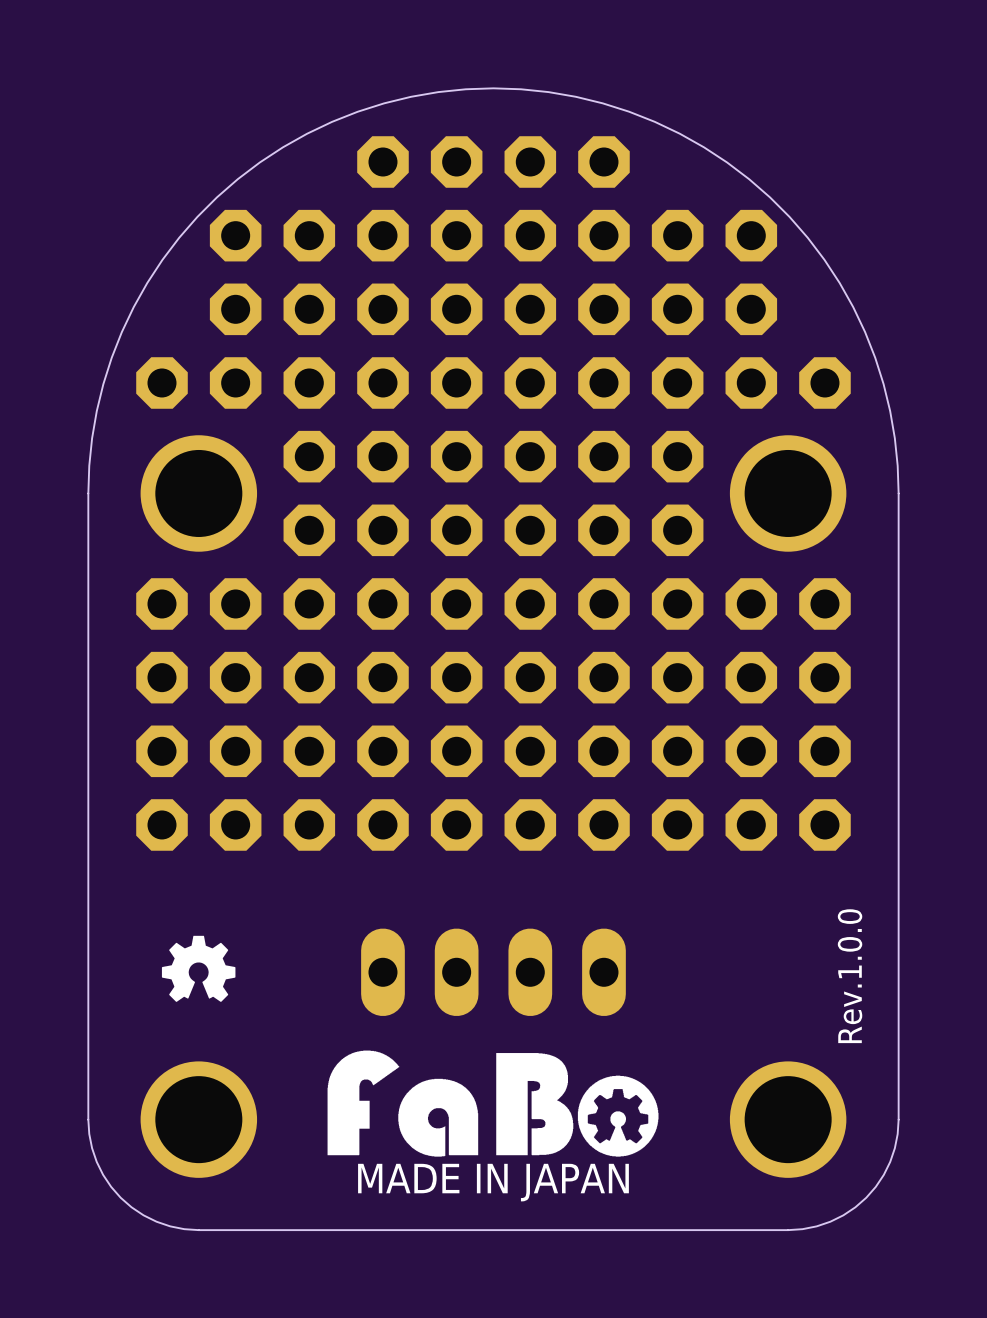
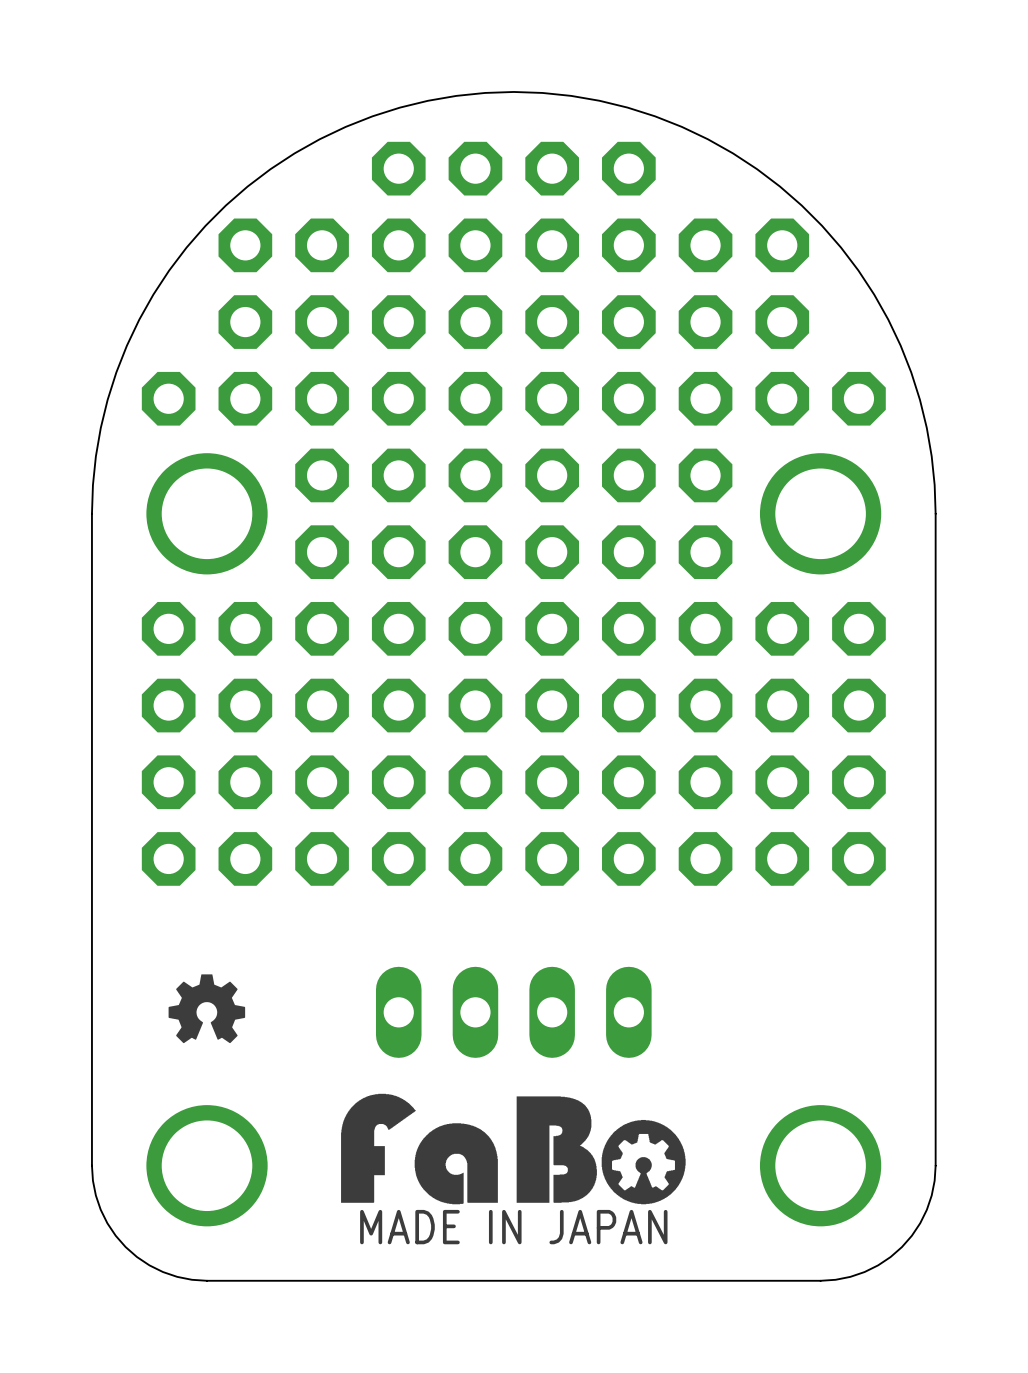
text: Rev.1.0.0 (850, 976) -> none

